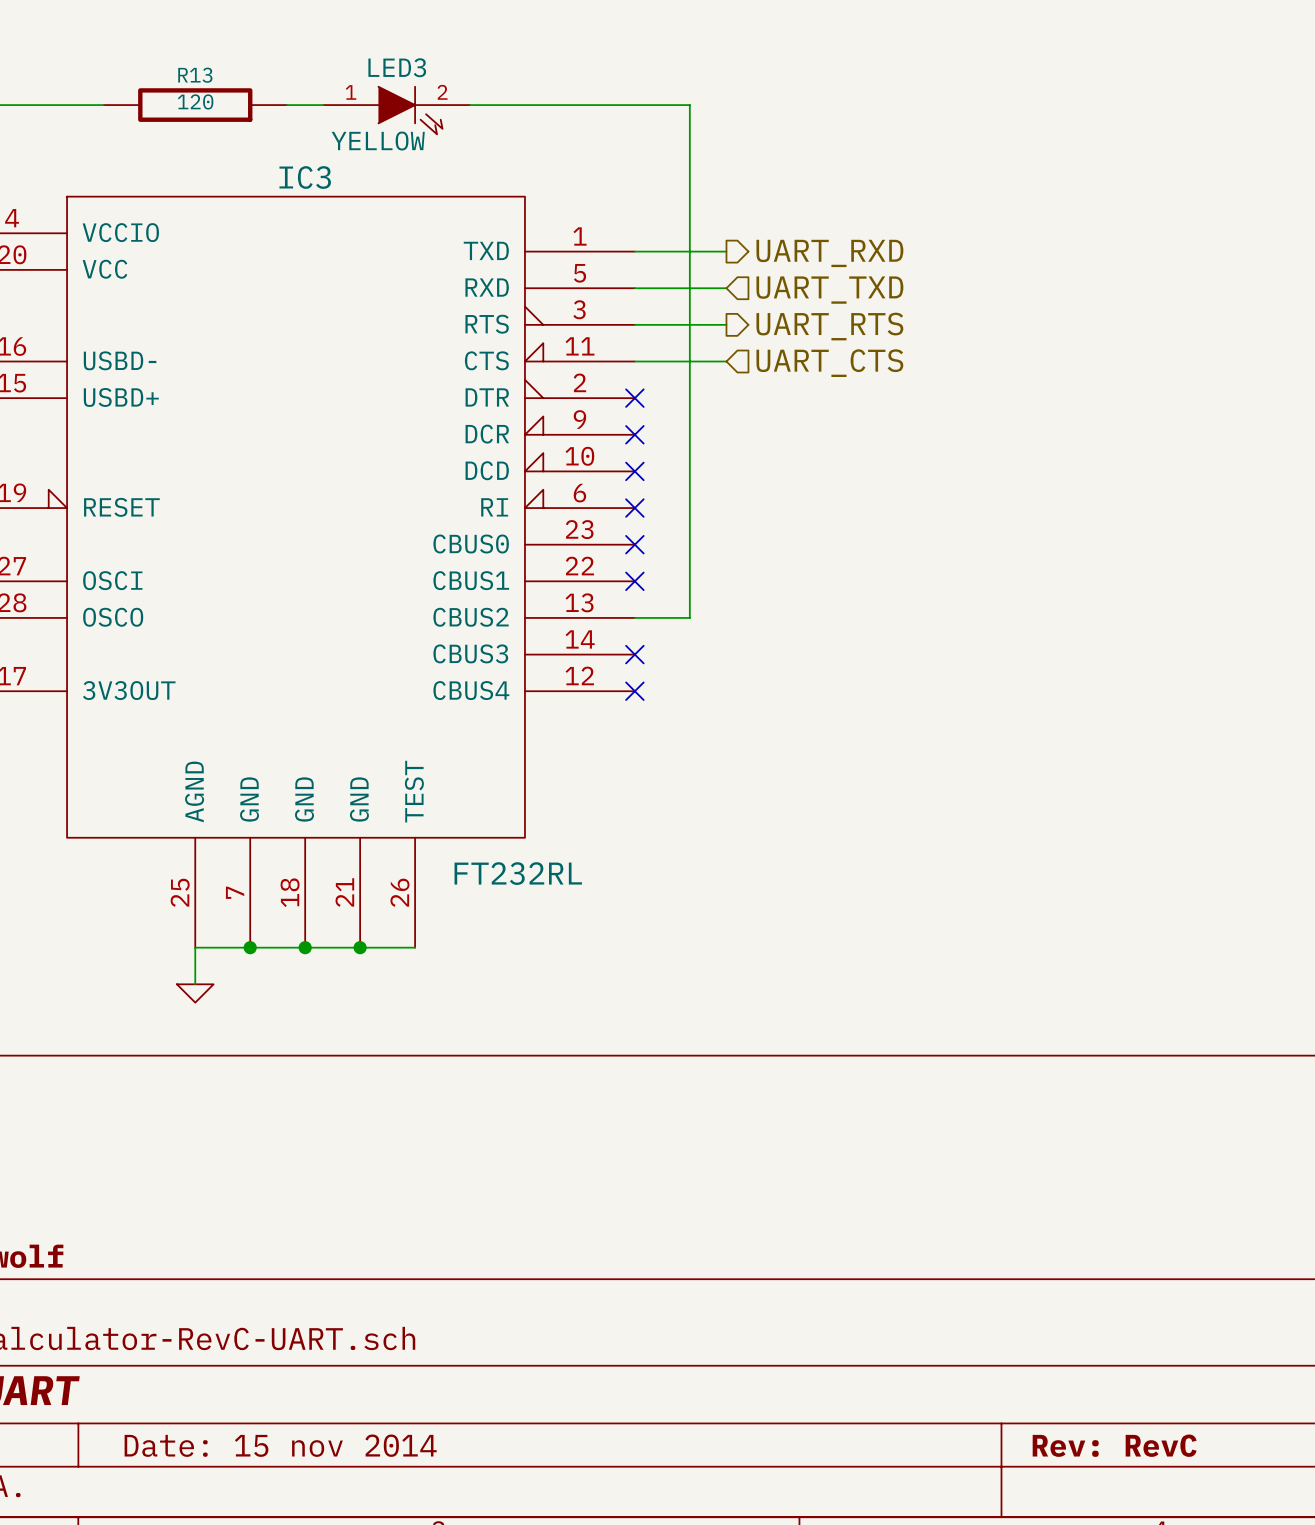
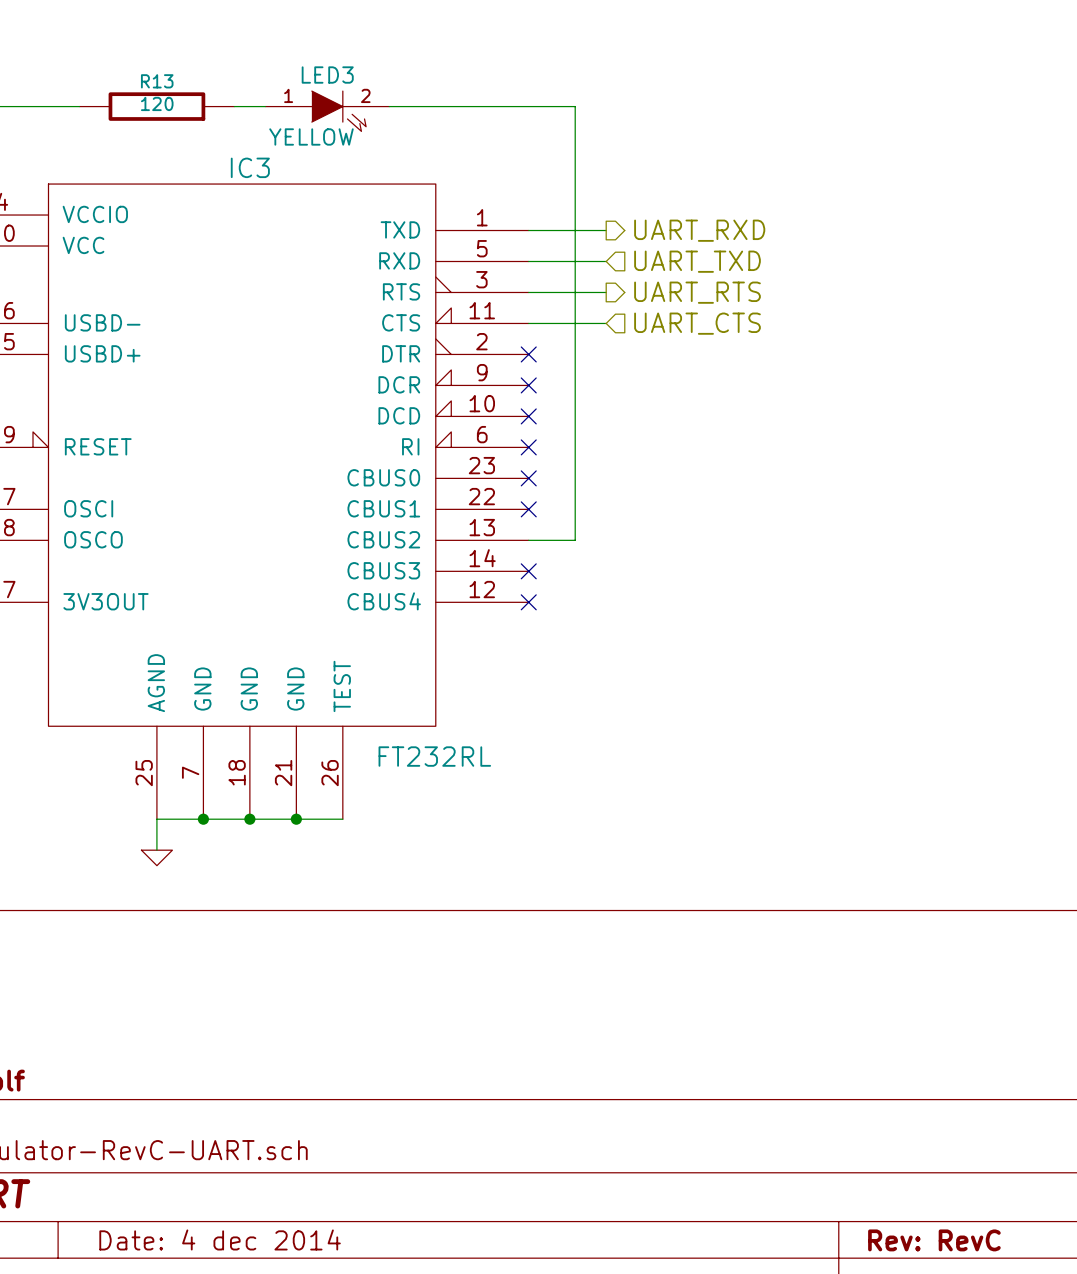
title block: Date: 15 nov 2014 (280, 1445) -> Date: 4 dec 2014 (220, 1239)

